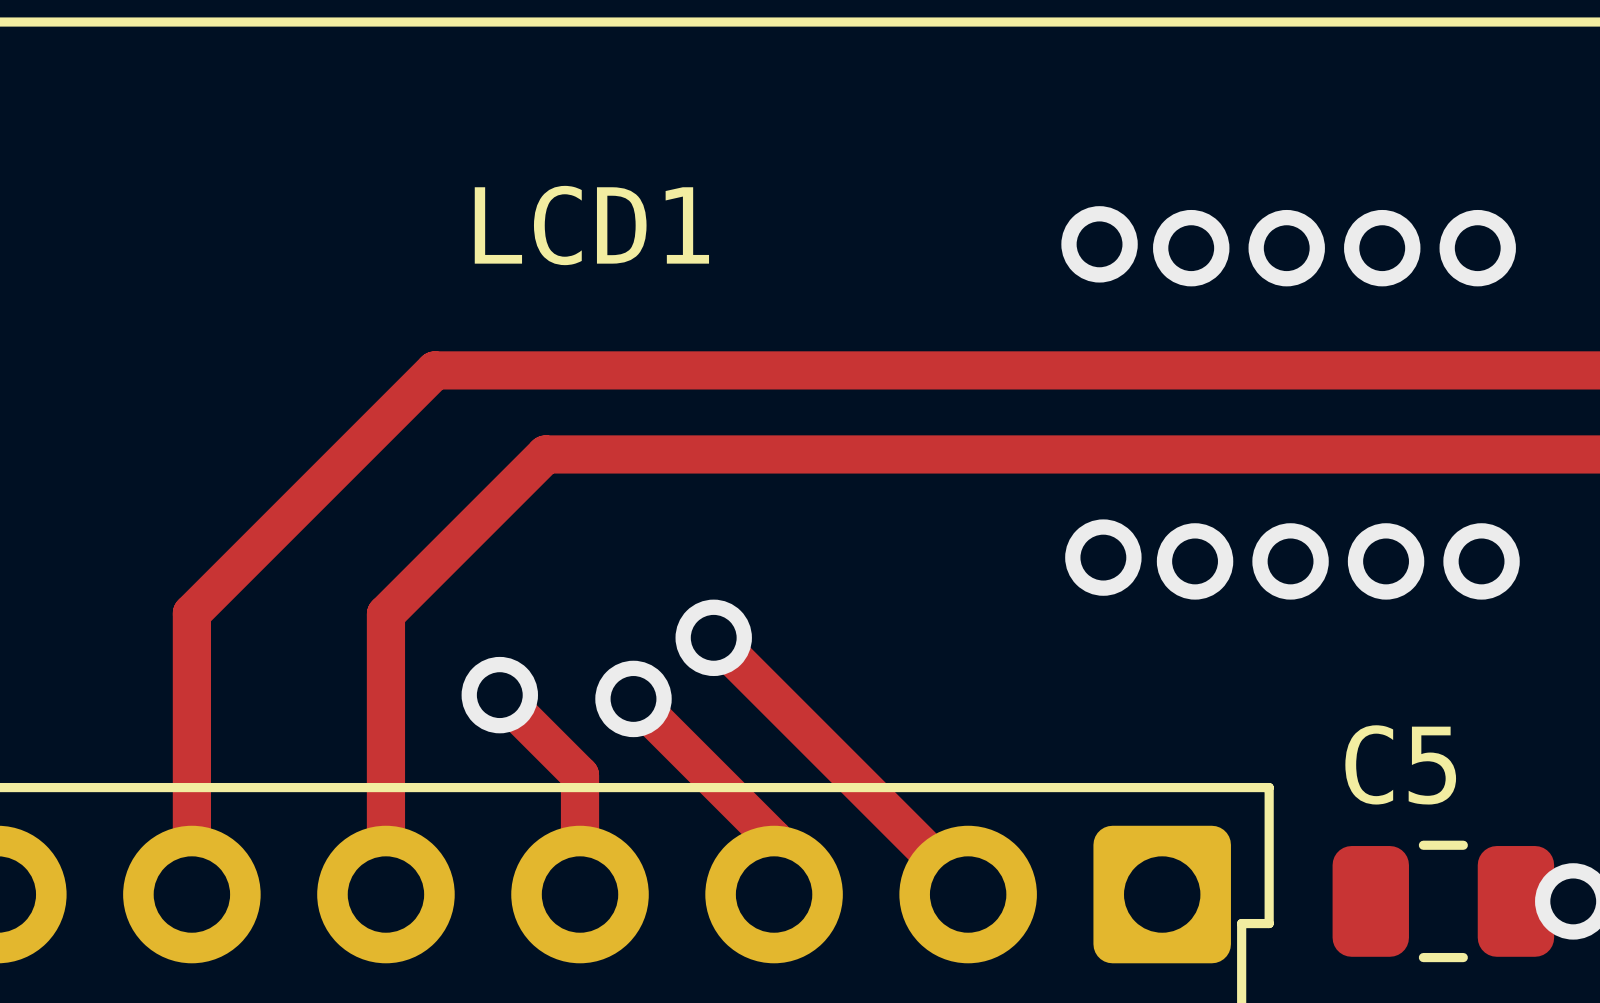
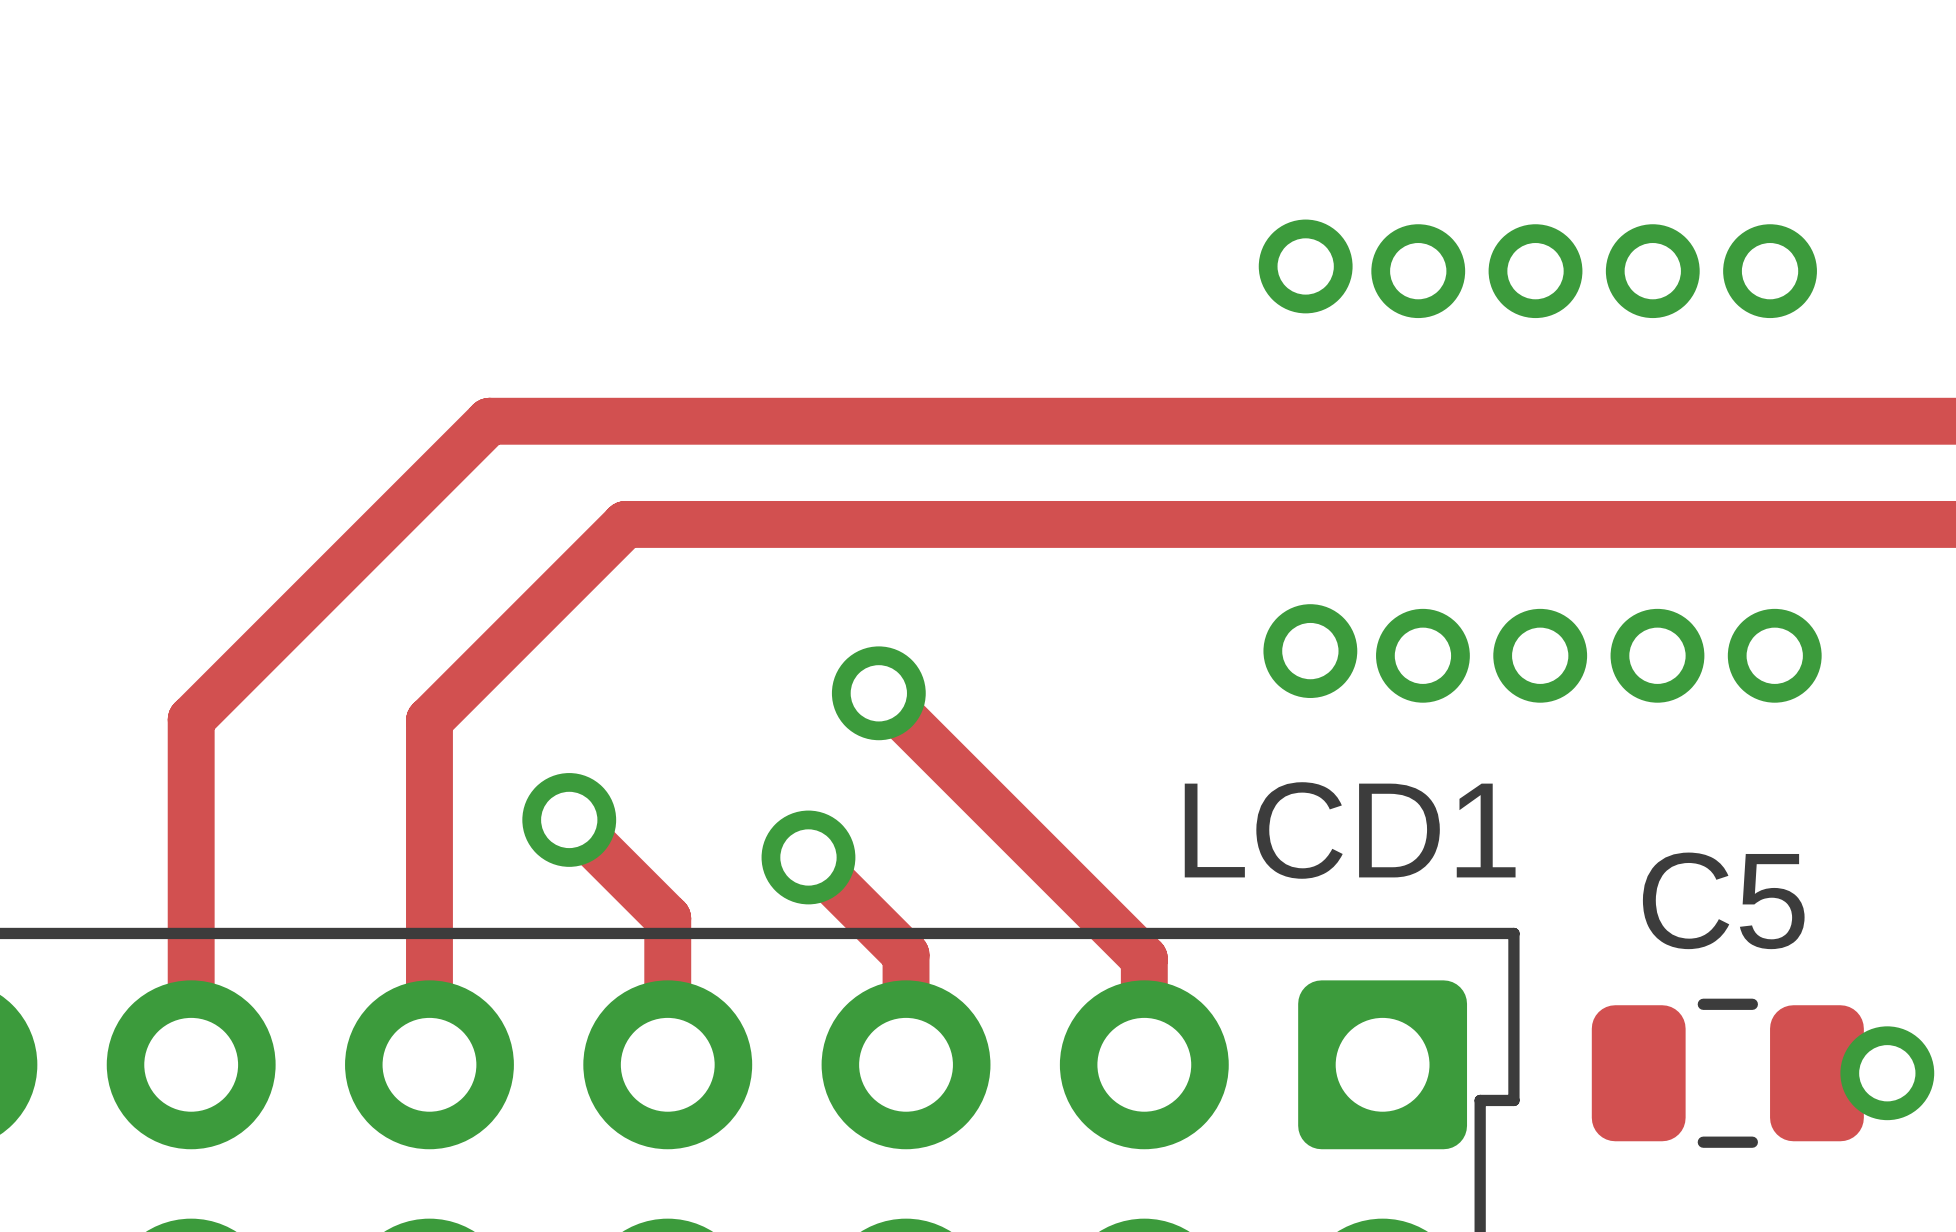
LCD1 name position: LCD1 (591, 225) -> LCD1 (1350, 830)
track: (713, 637) (968, 892) -> (878, 693) (1144, 958) (1144, 1061)
via position: (713, 637) -> (878, 693)
track: (633, 698) (774, 839) -> (808, 857) (906, 955) (906, 997)
via position: (633, 698) -> (808, 857)
C5 name position: C5 (1400, 764) -> C5 (1723, 900)

